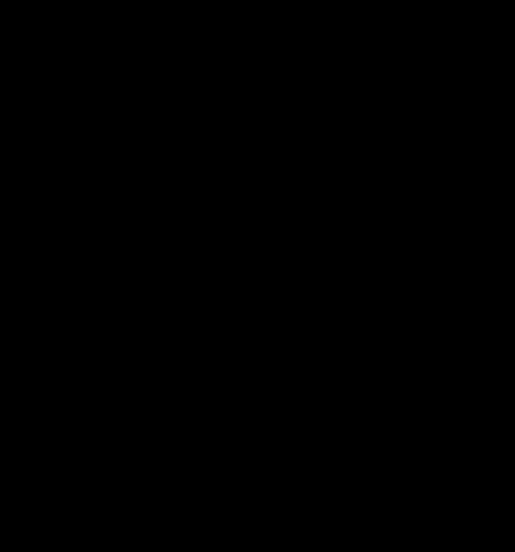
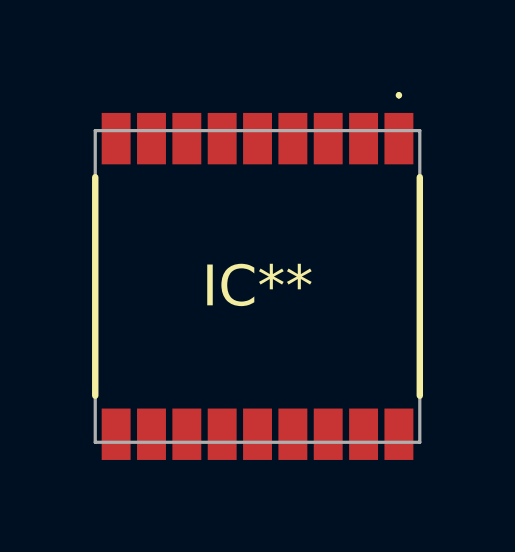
IC**: none -> (257, 276)

